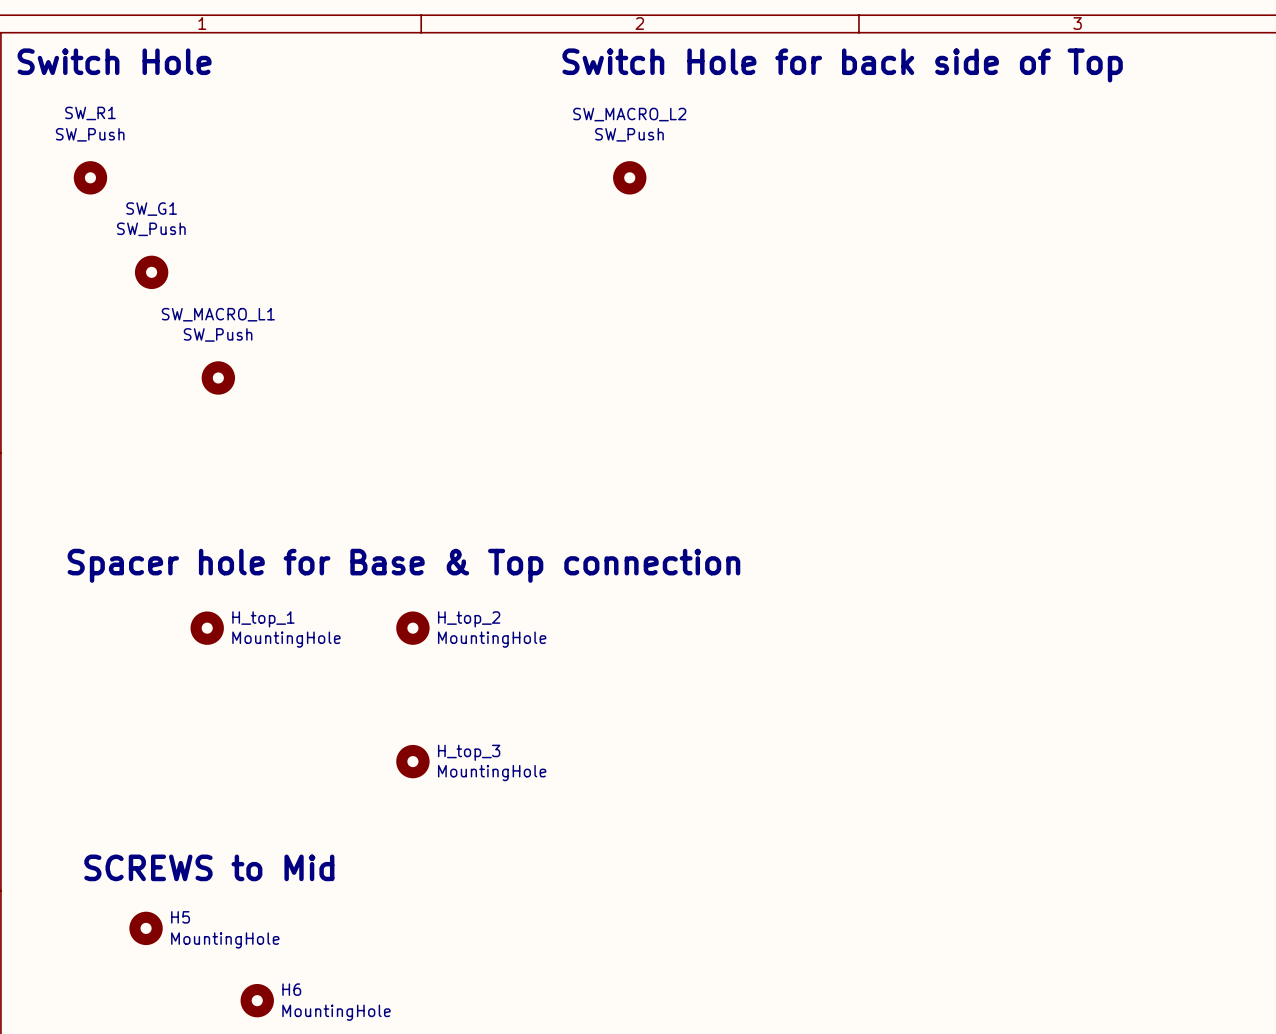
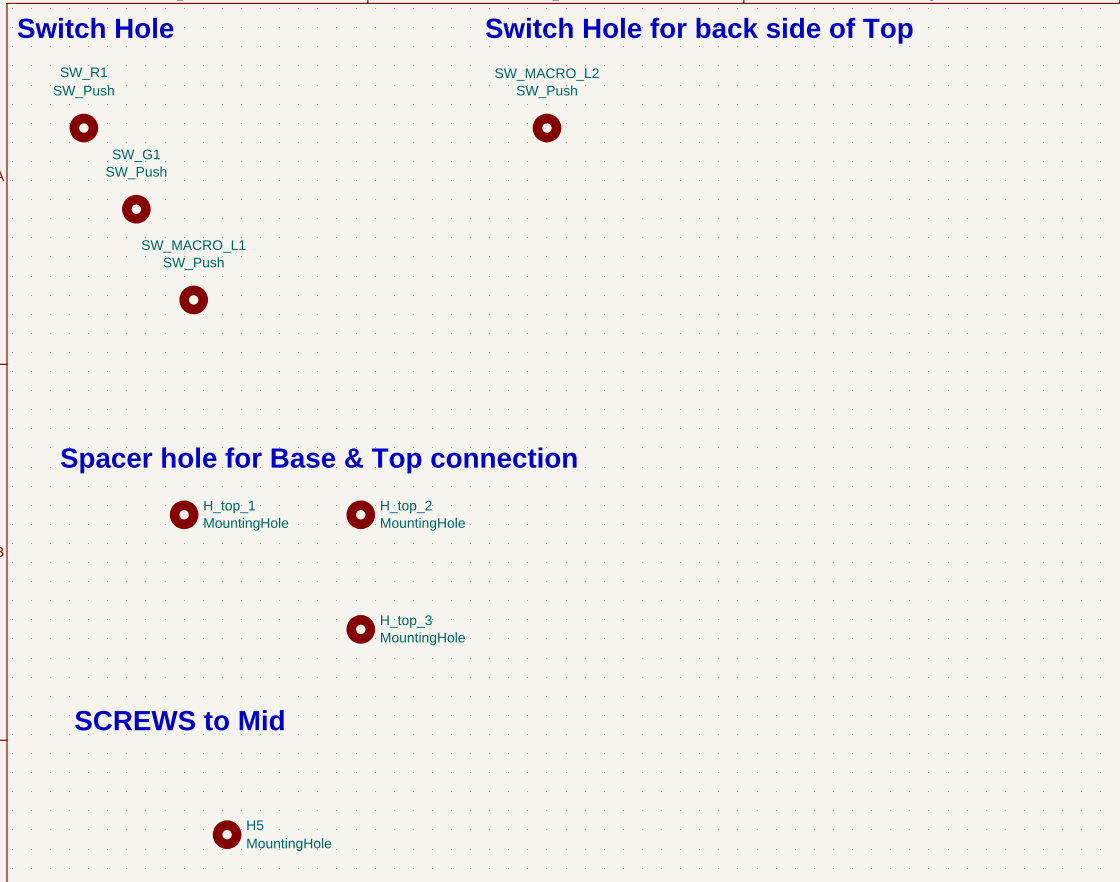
H5: MountingHole (146, 928) -> none
H6 name: H6 (291, 989) -> H5 (255, 825)

